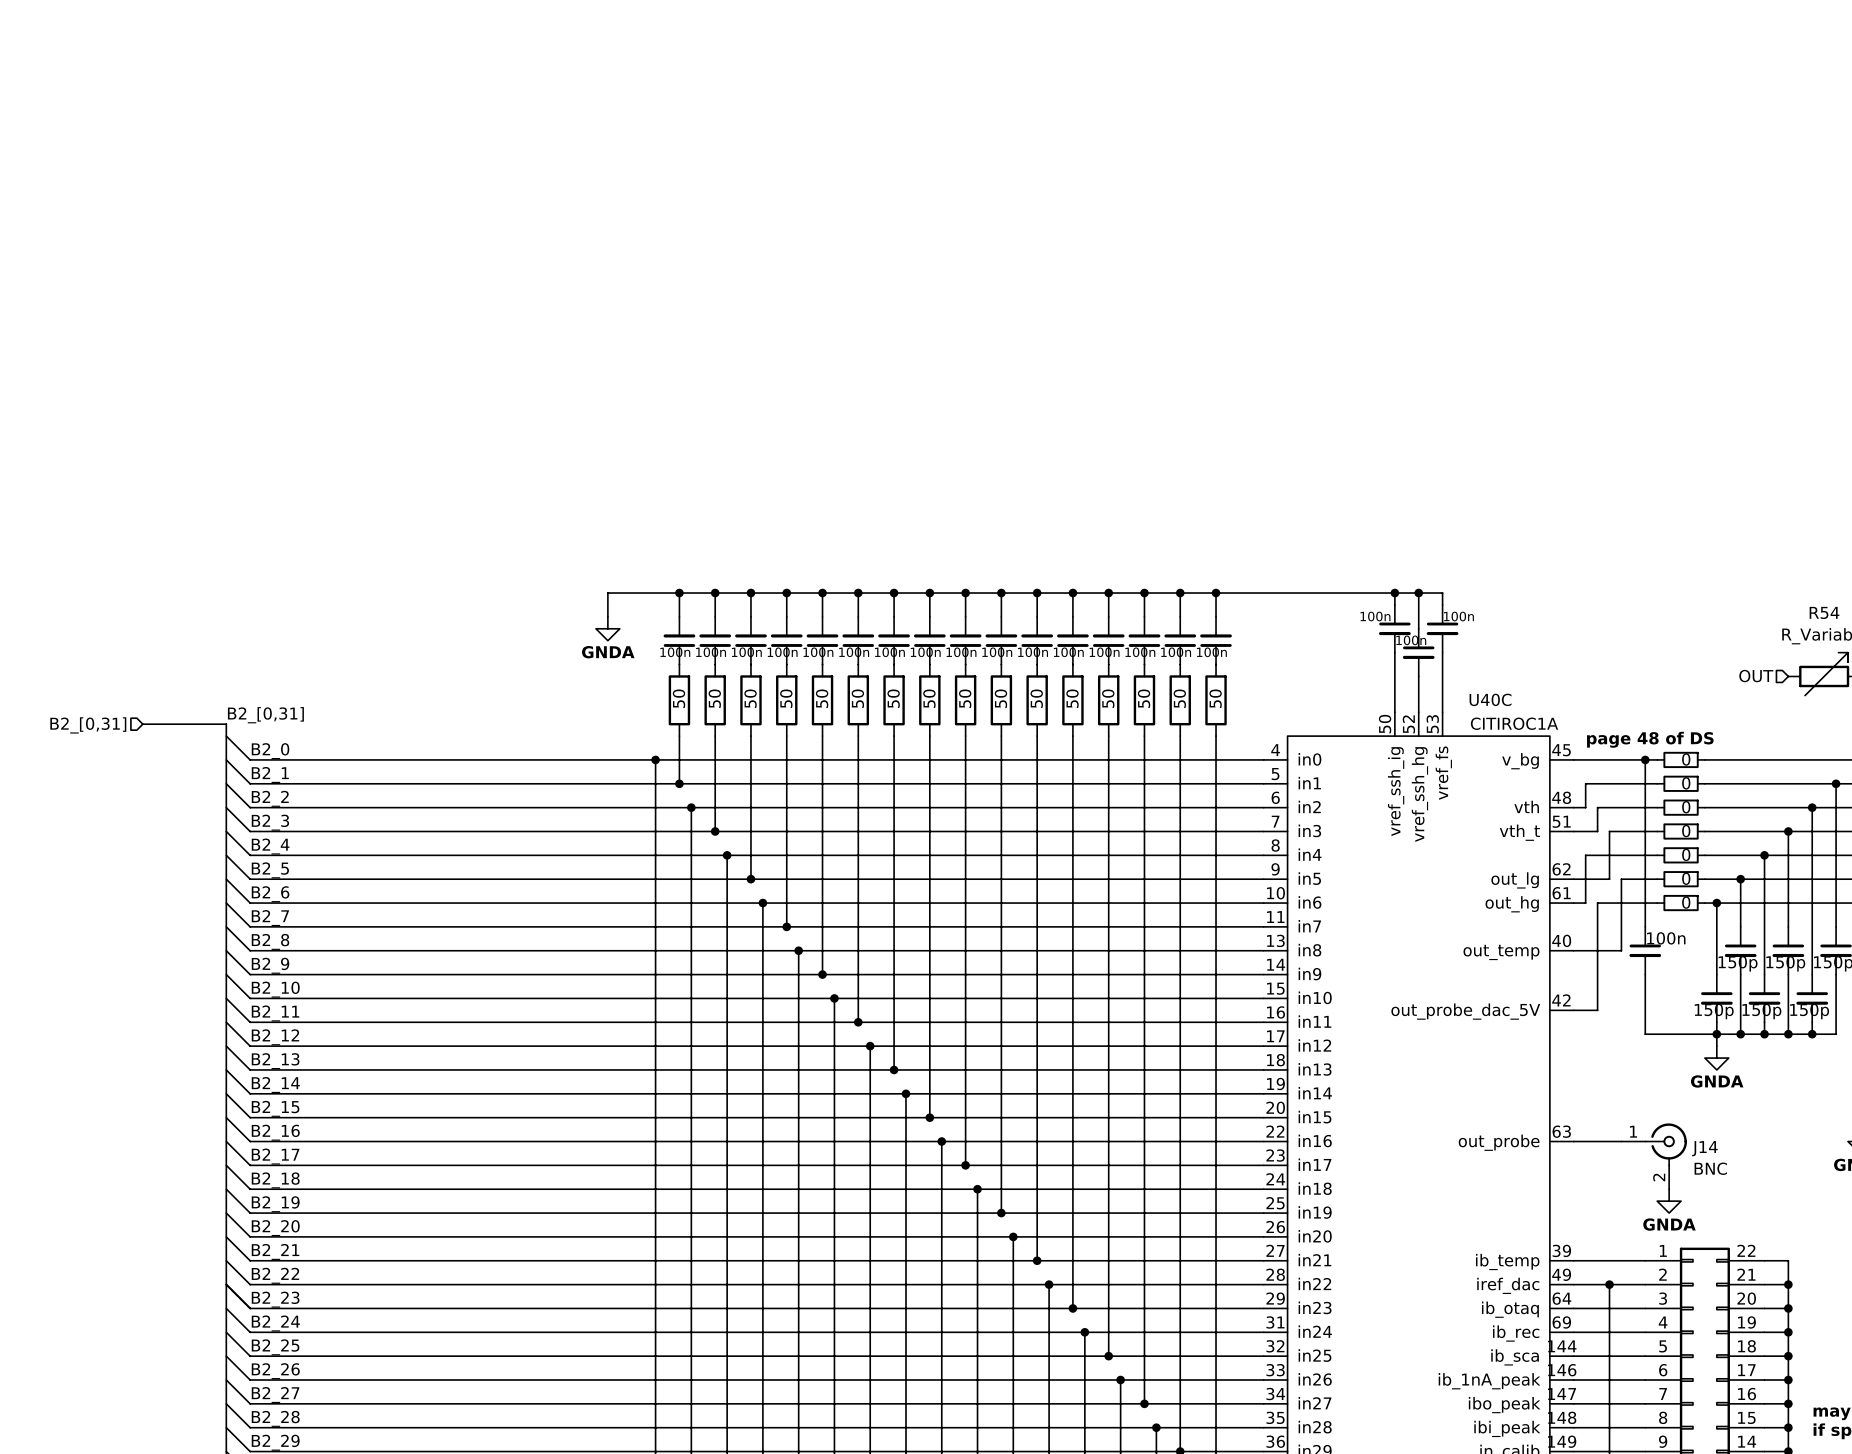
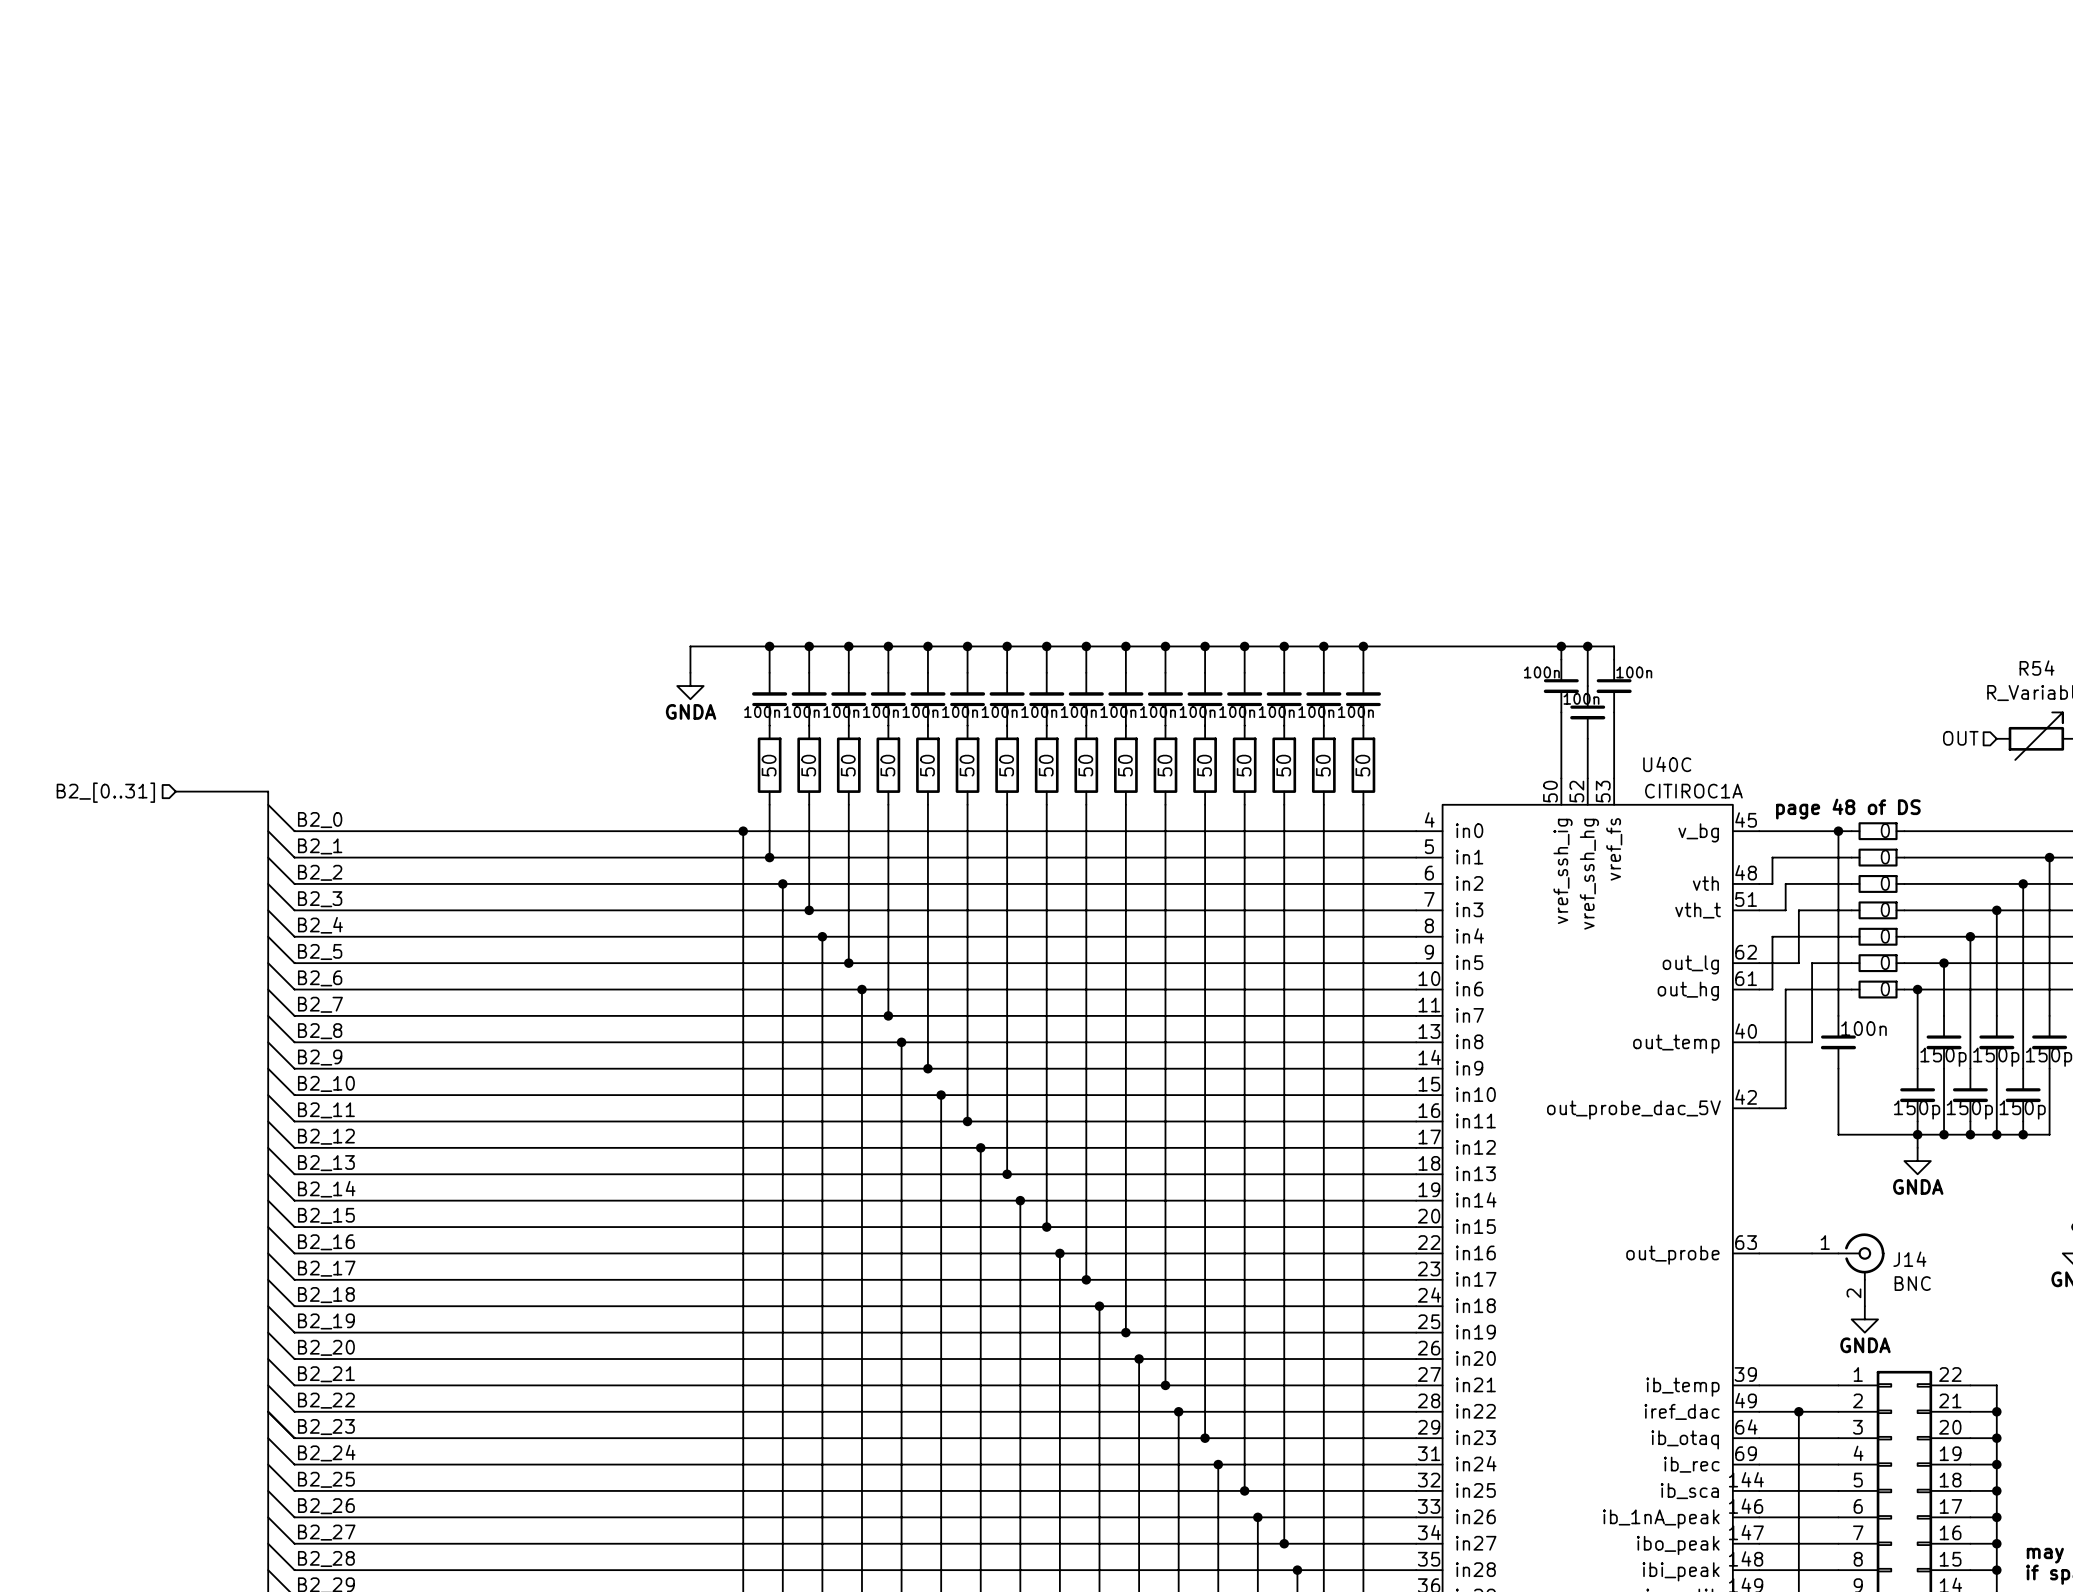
label: B2_[0,31] (265, 715) -> none
hierarchical label: B2_[0,31] (88, 725) -> B2_[0..31] (105, 792)

